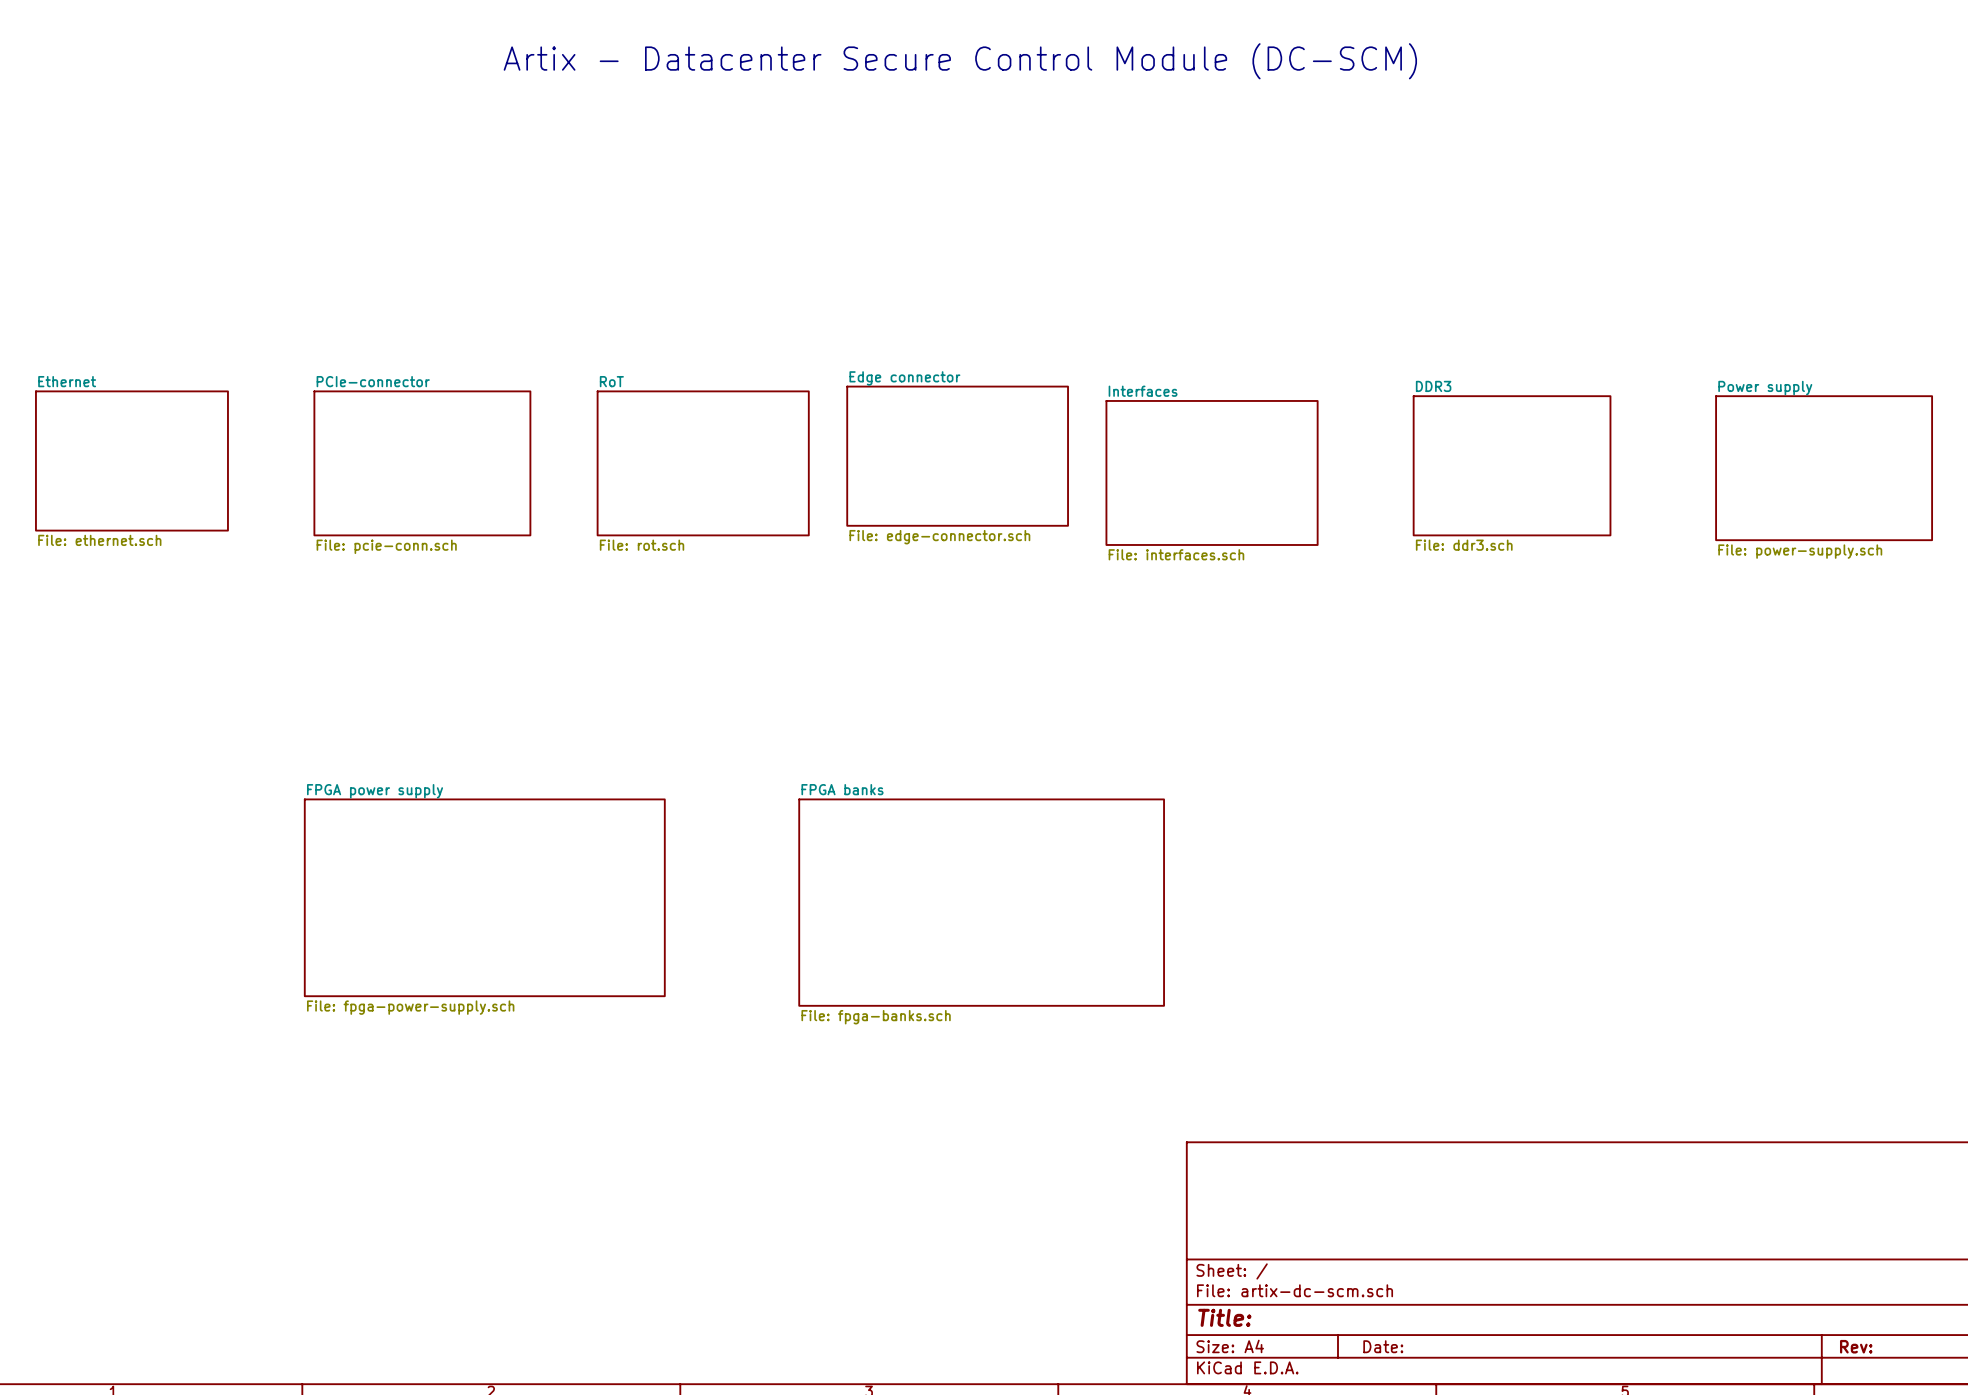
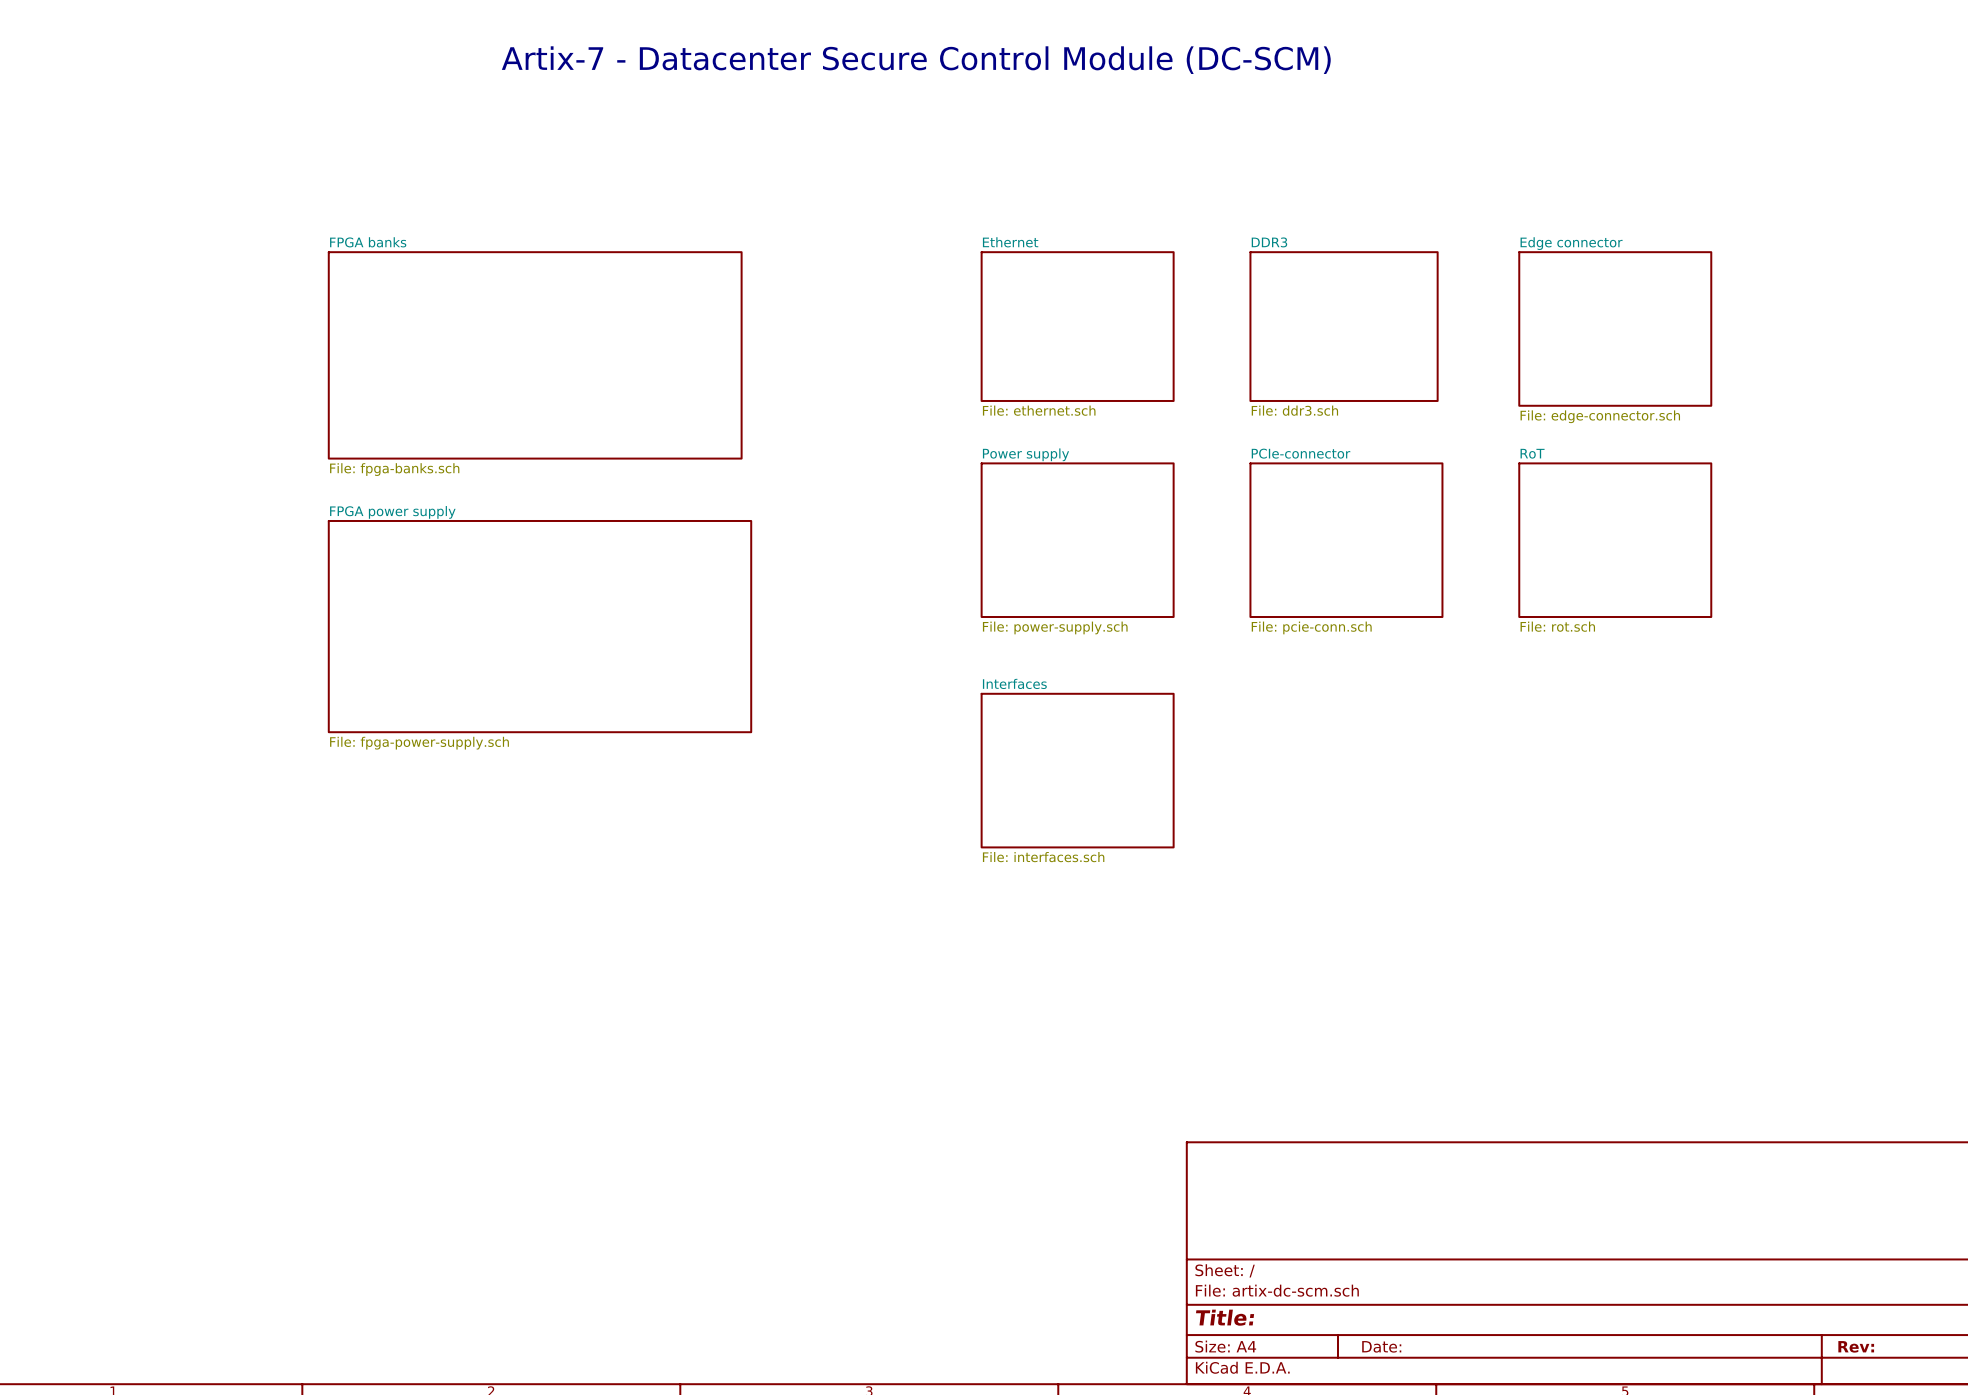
text: Artix - Datacenter Secure Control Module (DC-SCM) (960, 61) -> Artix-7 - Datacenter Secure Control Module (DC-SCM) (916, 60)
sheet Ethernet: none -> File: ethernet.sch (1077, 326)
sheet Edge connector: none -> File: edge-connector.sch (1615, 328)
sheet FPGA banks: none -> File: fpga-banks.sch (535, 355)
sheet DDR3 shape: [1413, 396, 1611, 536] -> [1250, 252, 1438, 401]
sheet Edge connector: File: edge-connector.sch (957, 456) -> none
sheet Ethernet: File: ethernet.sch (131, 460) -> none
sheet PCIe-connector: File: pcie-conn.sch (422, 463) -> none
sheet RoT: File: rot.sch (703, 463) -> none
sheet Power supply: File: power-supply.sch (1824, 468) -> none
sheet Interfaces: File: interfaces.sch (1212, 472) -> none
sheet Power supply: none -> File: power-supply.sch (1077, 540)
sheet PCIe-connector: none -> File: pcie-conn.sch (1346, 540)
sheet RoT: none -> File: rot.sch (1615, 540)
sheet FPGA power supply: none -> File: fpga-power-supply.sch (540, 626)
sheet Interfaces: none -> File: interfaces.sch (1077, 770)
sheet FPGA power supply: File: fpga-power-supply.sch (484, 897) -> none
sheet FPGA banks: File: fpga-banks.sch (981, 902) -> none

